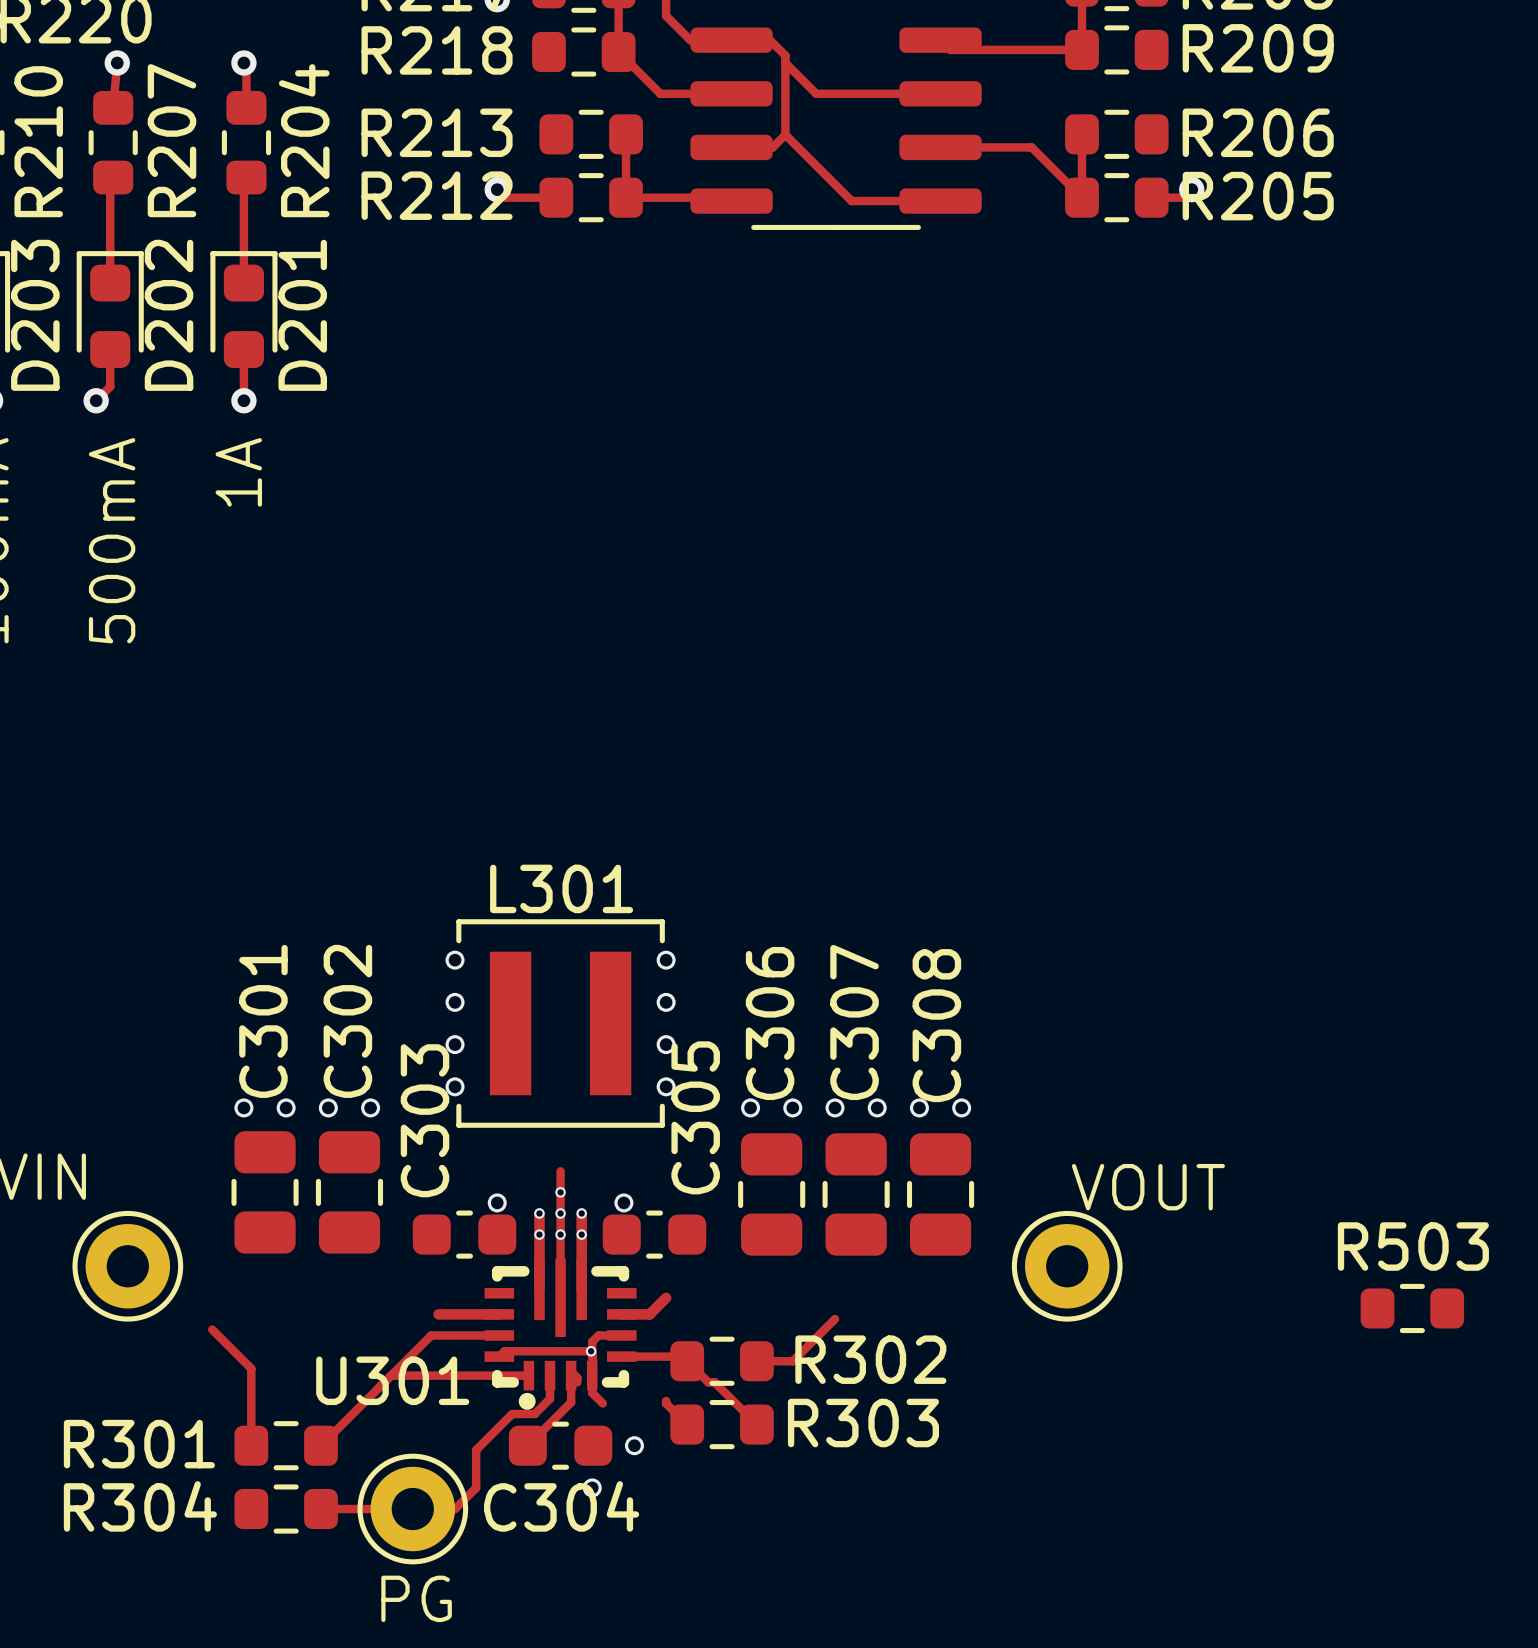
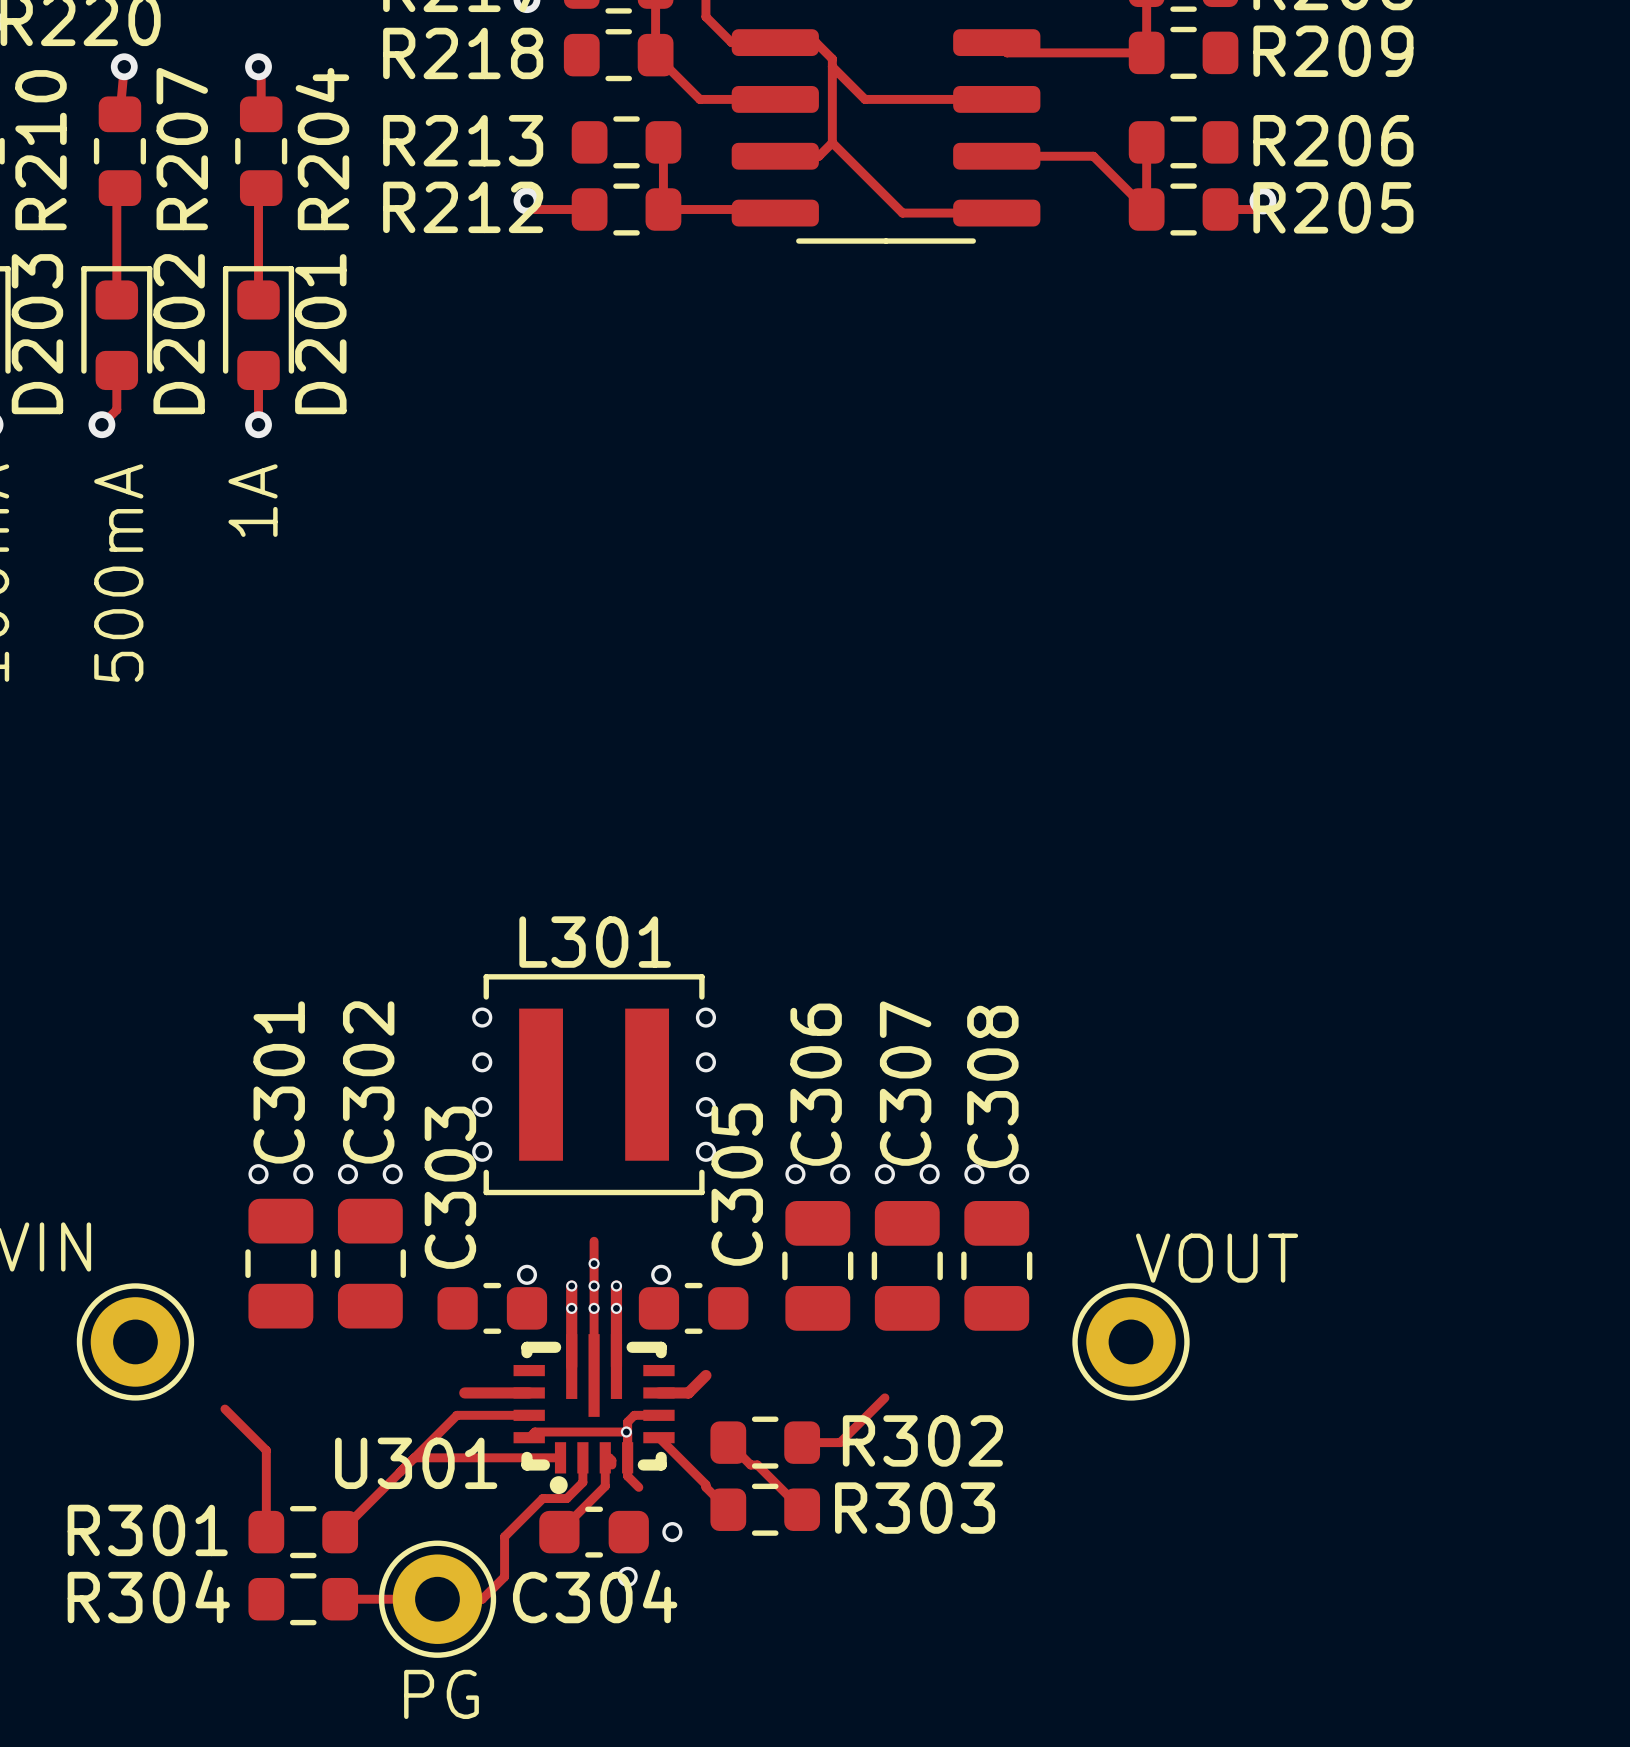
R503: (1412, 1308) -> none
track: (621, 1356) (682, 1356) (687, 1361) -> (658, 1437) (705, 1484)

